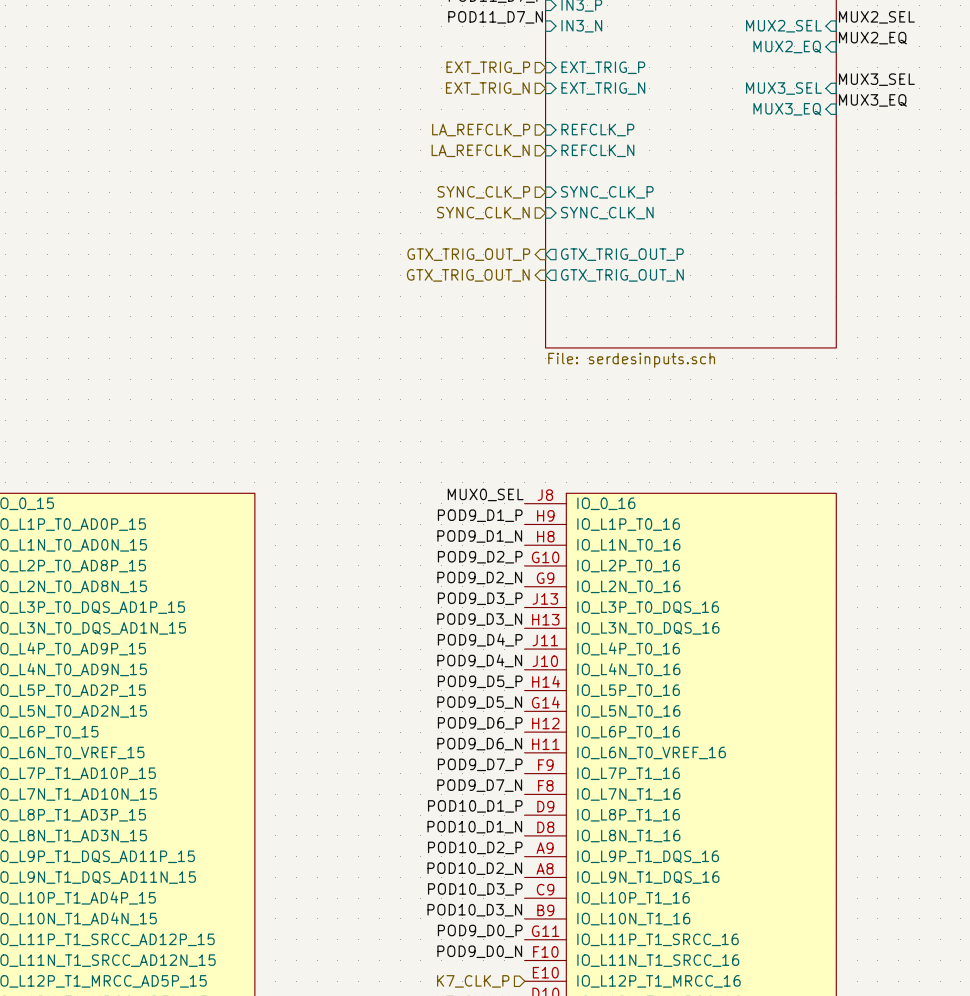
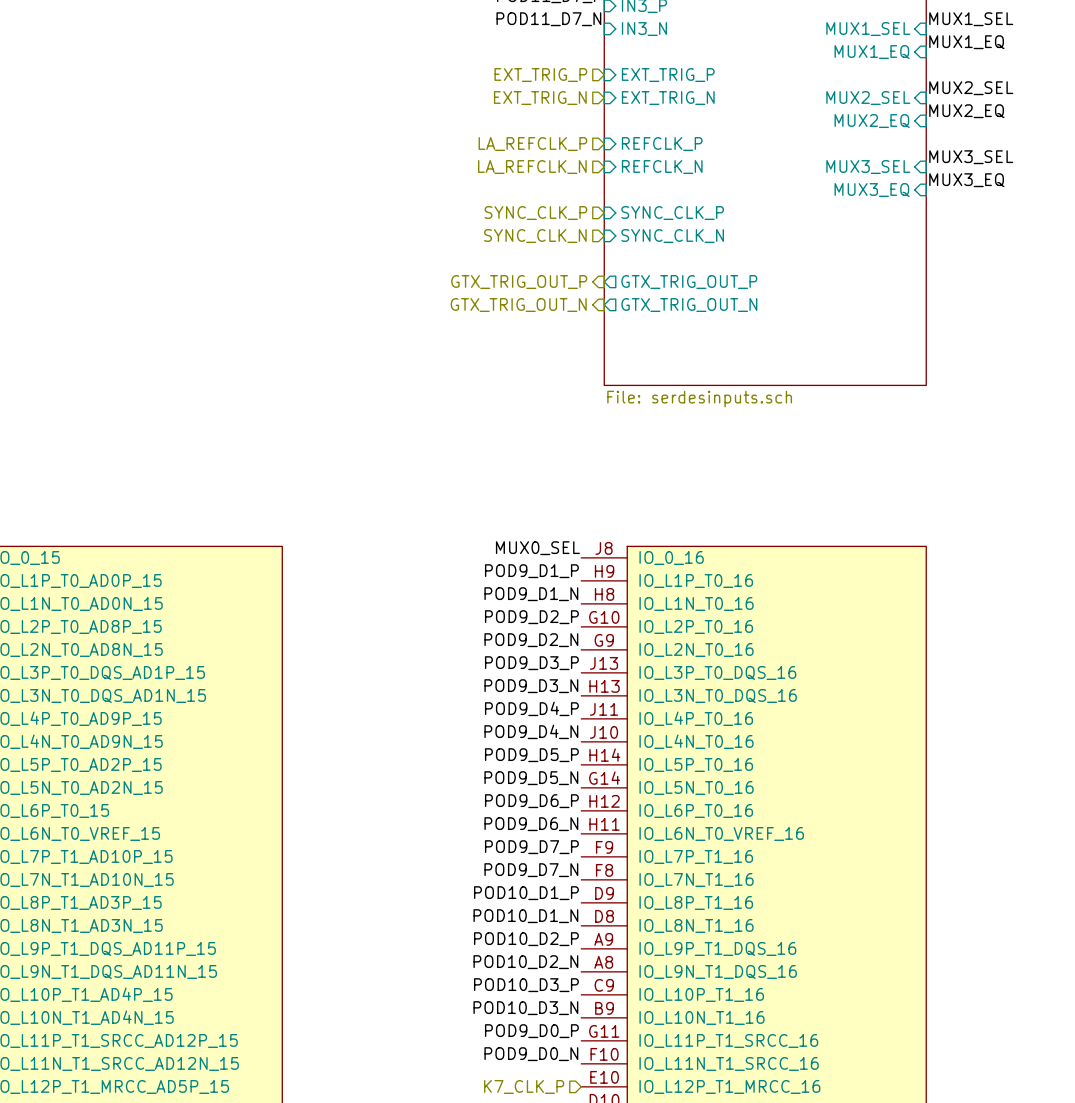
label: MUX2_SEL (876, 17) -> MUX1_SEL (971, 19)
sheet pin: MUX2_SEL (783, 26) -> MUX1_SEL (868, 29)
label: MUX2_EQ (872, 38) -> MUX1_EQ (966, 42)
sheet pin: MUX2_EQ (787, 46) -> MUX1_EQ (872, 52)
label: MUX3_SEL (876, 79) -> MUX2_SEL (971, 88)
sheet pin: MUX3_SEL (783, 88) -> MUX2_SEL (868, 98)
label: MUX3_EQ (872, 100) -> MUX2_EQ (966, 111)
sheet pin: MUX3_EQ (787, 109) -> MUX2_EQ (872, 121)
label: none -> MUX3_SEL (971, 157)
sheet pin: none -> MUX3_SEL (868, 167)
label: none -> MUX3_EQ (966, 180)
sheet pin: none -> MUX3_EQ (872, 190)

